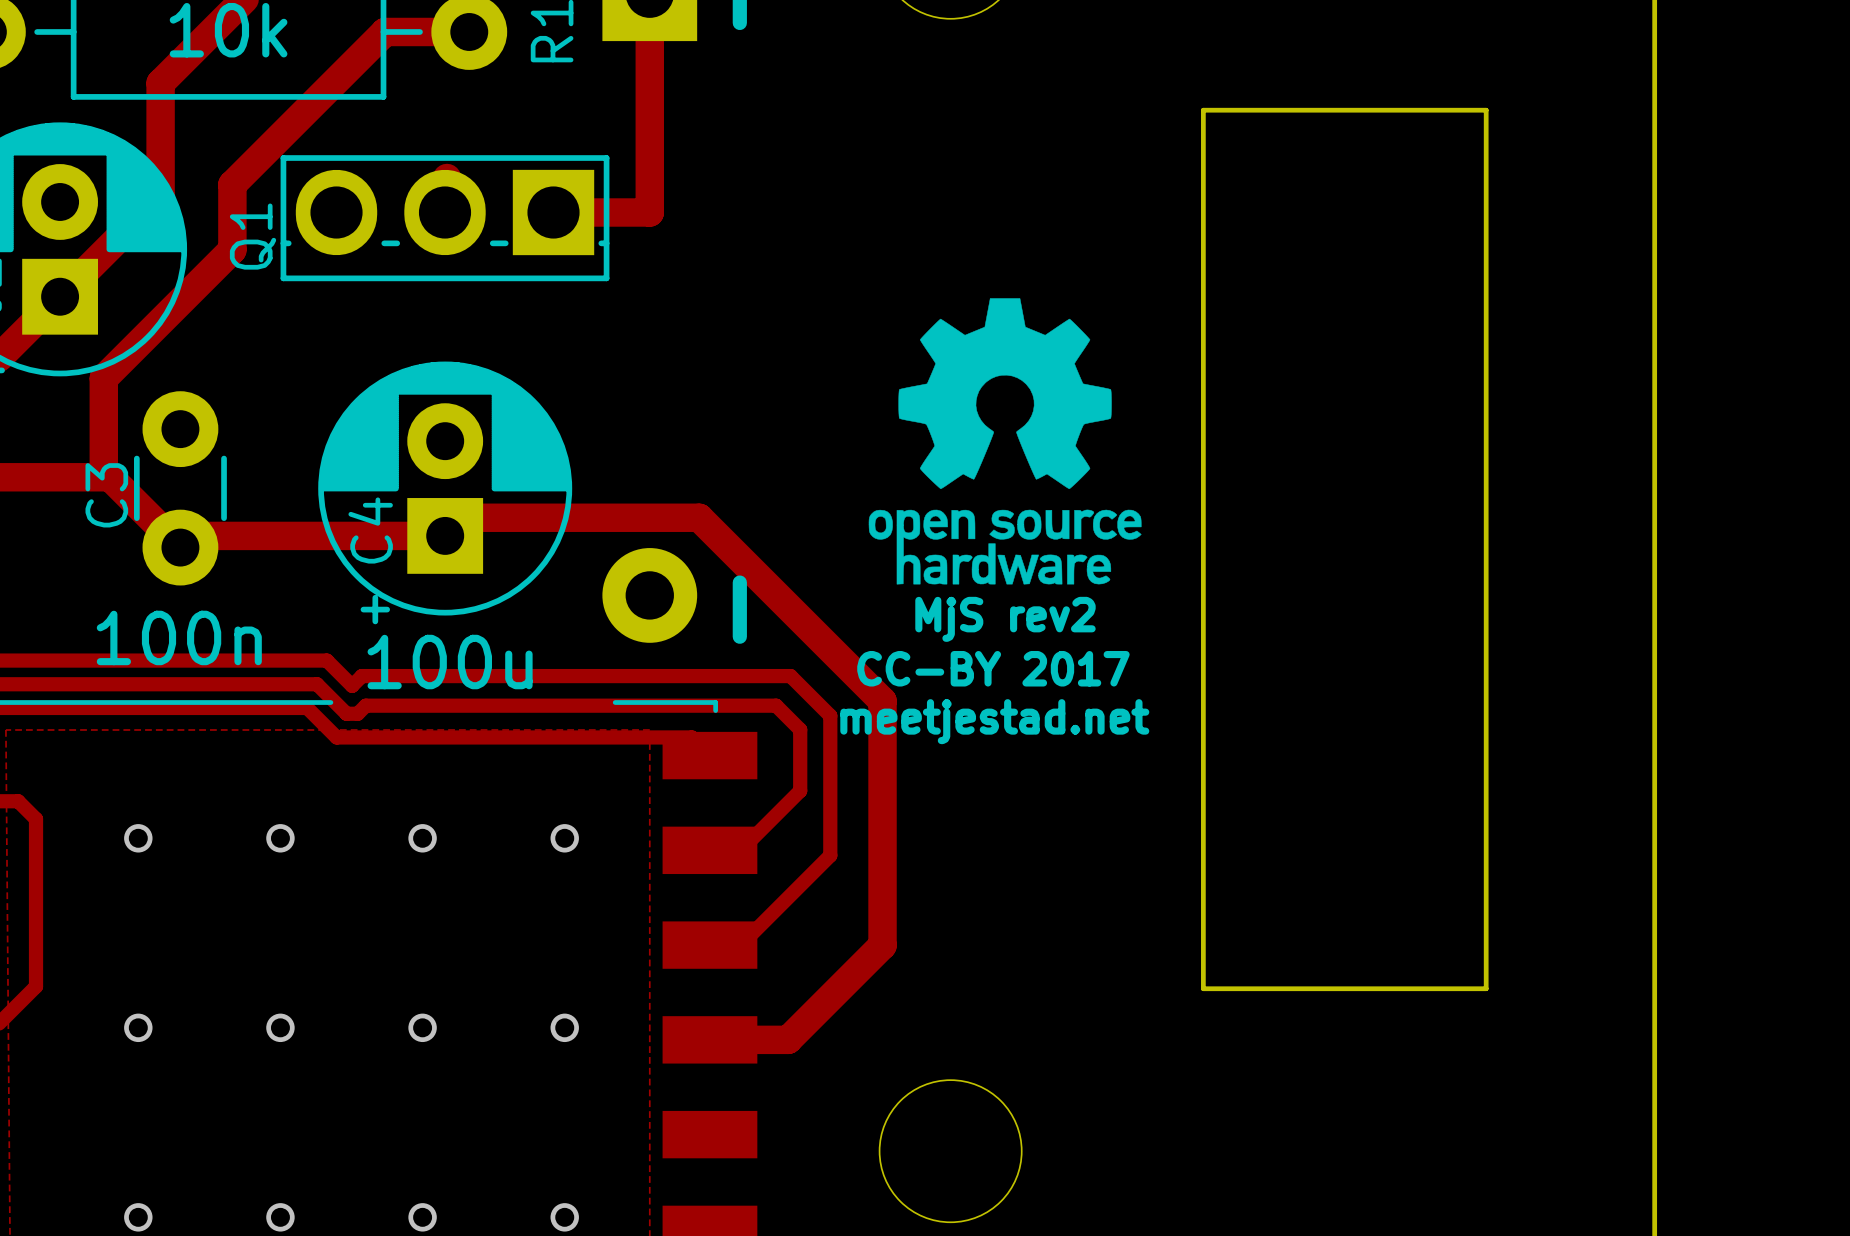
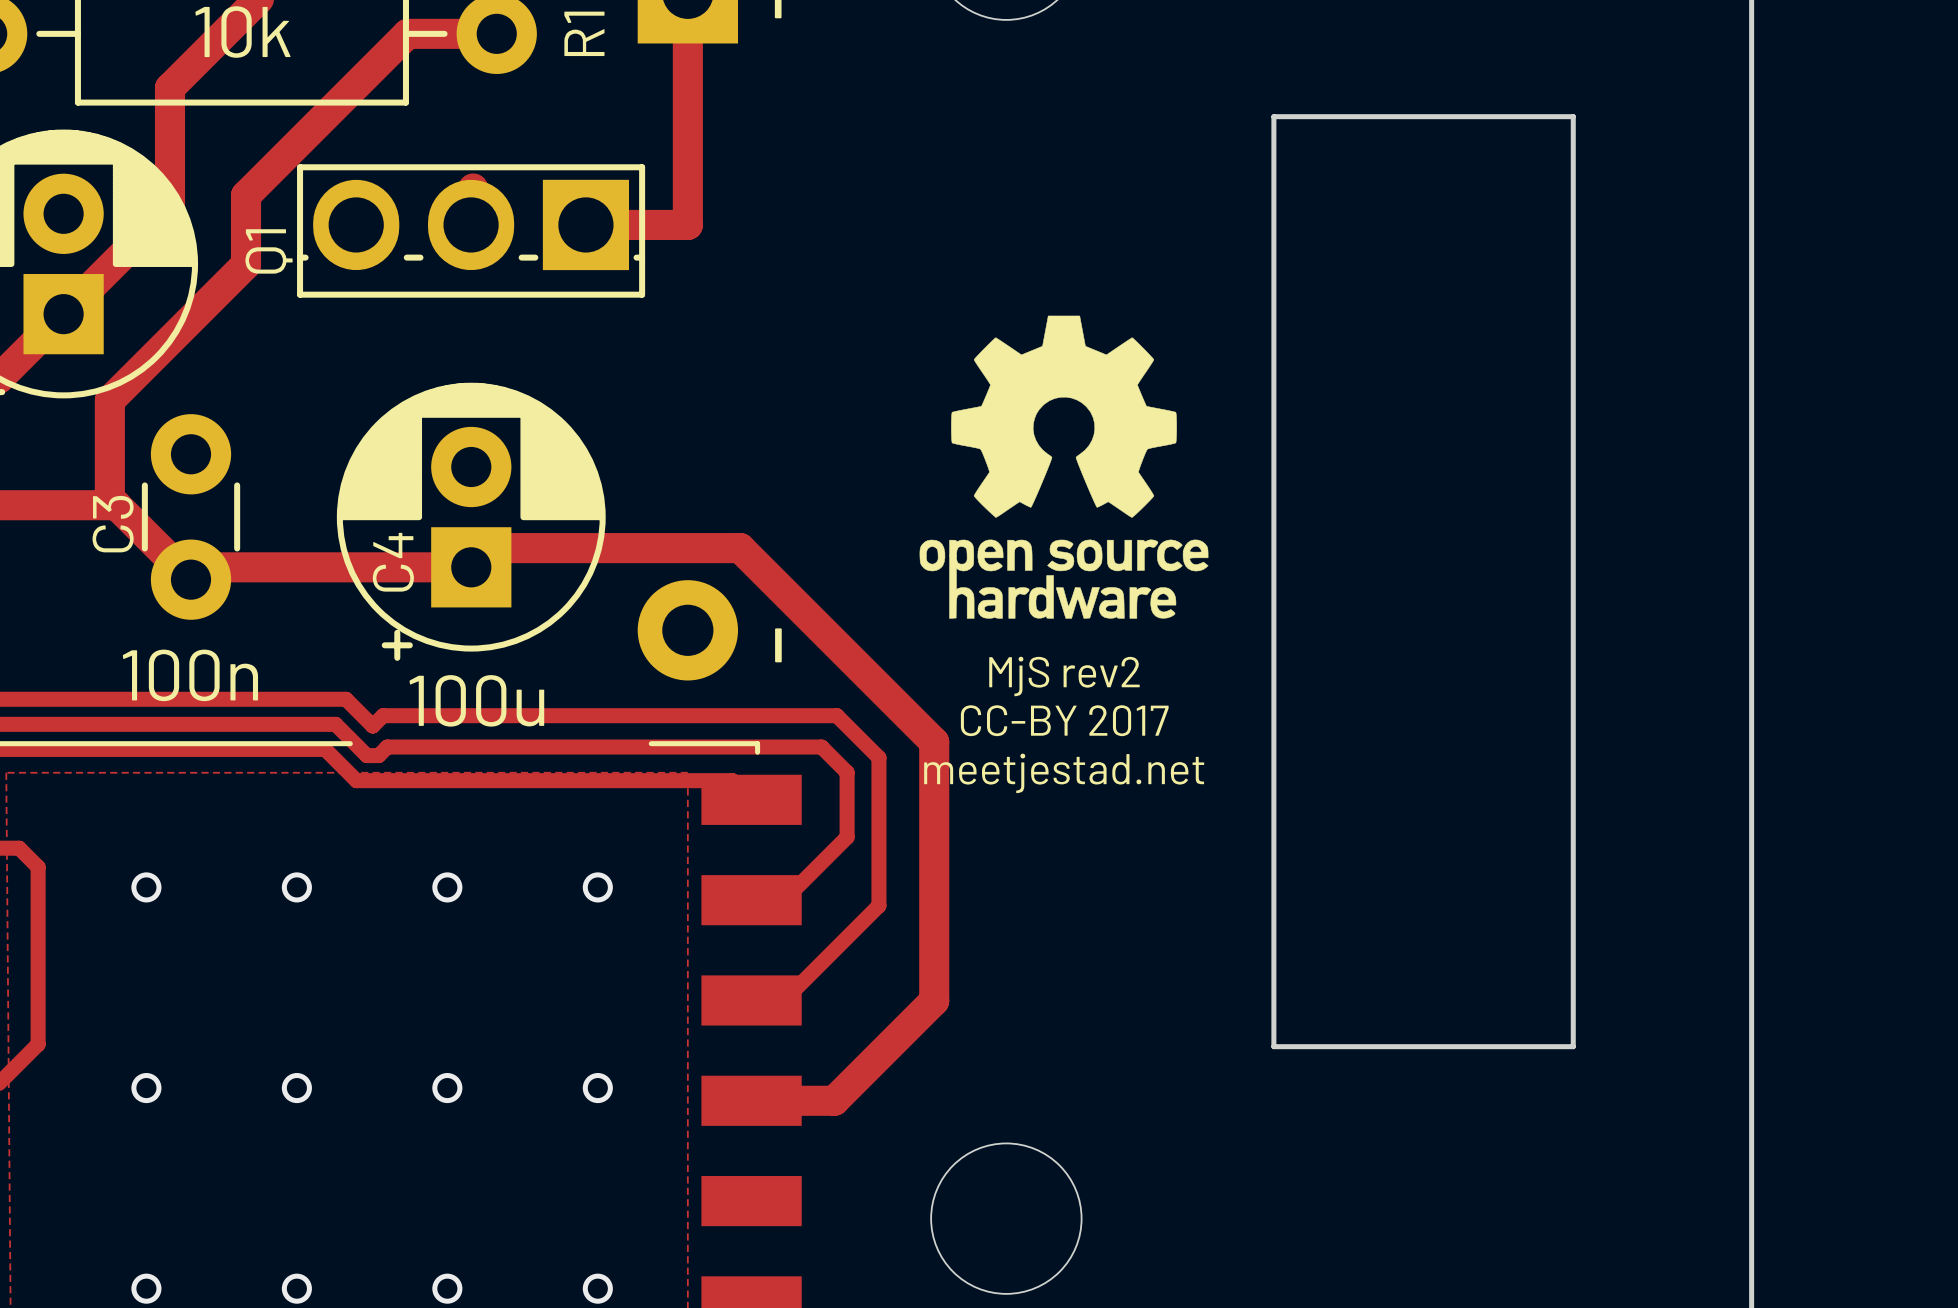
text position: MjS rev2 (1005, 619) -> MjS rev2 (1064, 676)
text position: CC-BY 2017 (993, 668) -> CC-BY 2017 (1064, 720)
text position: meetjestad.net (994, 721) -> meetjestad.net (1064, 773)

